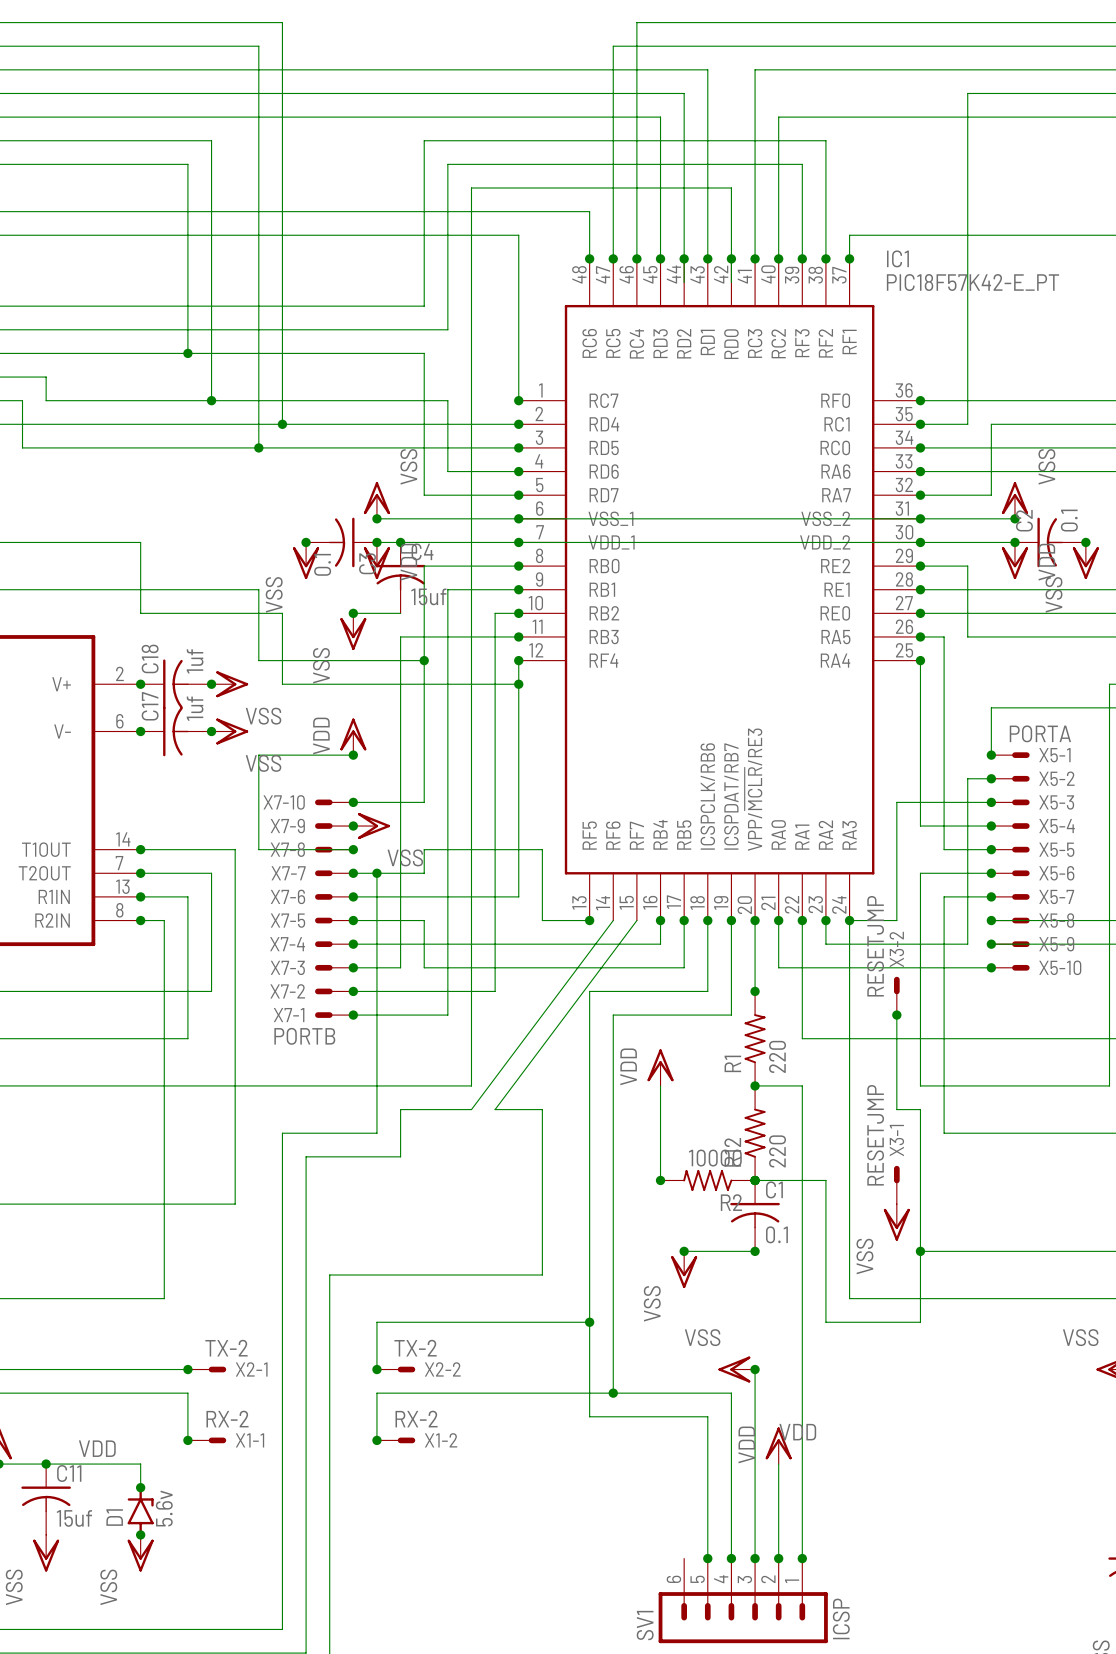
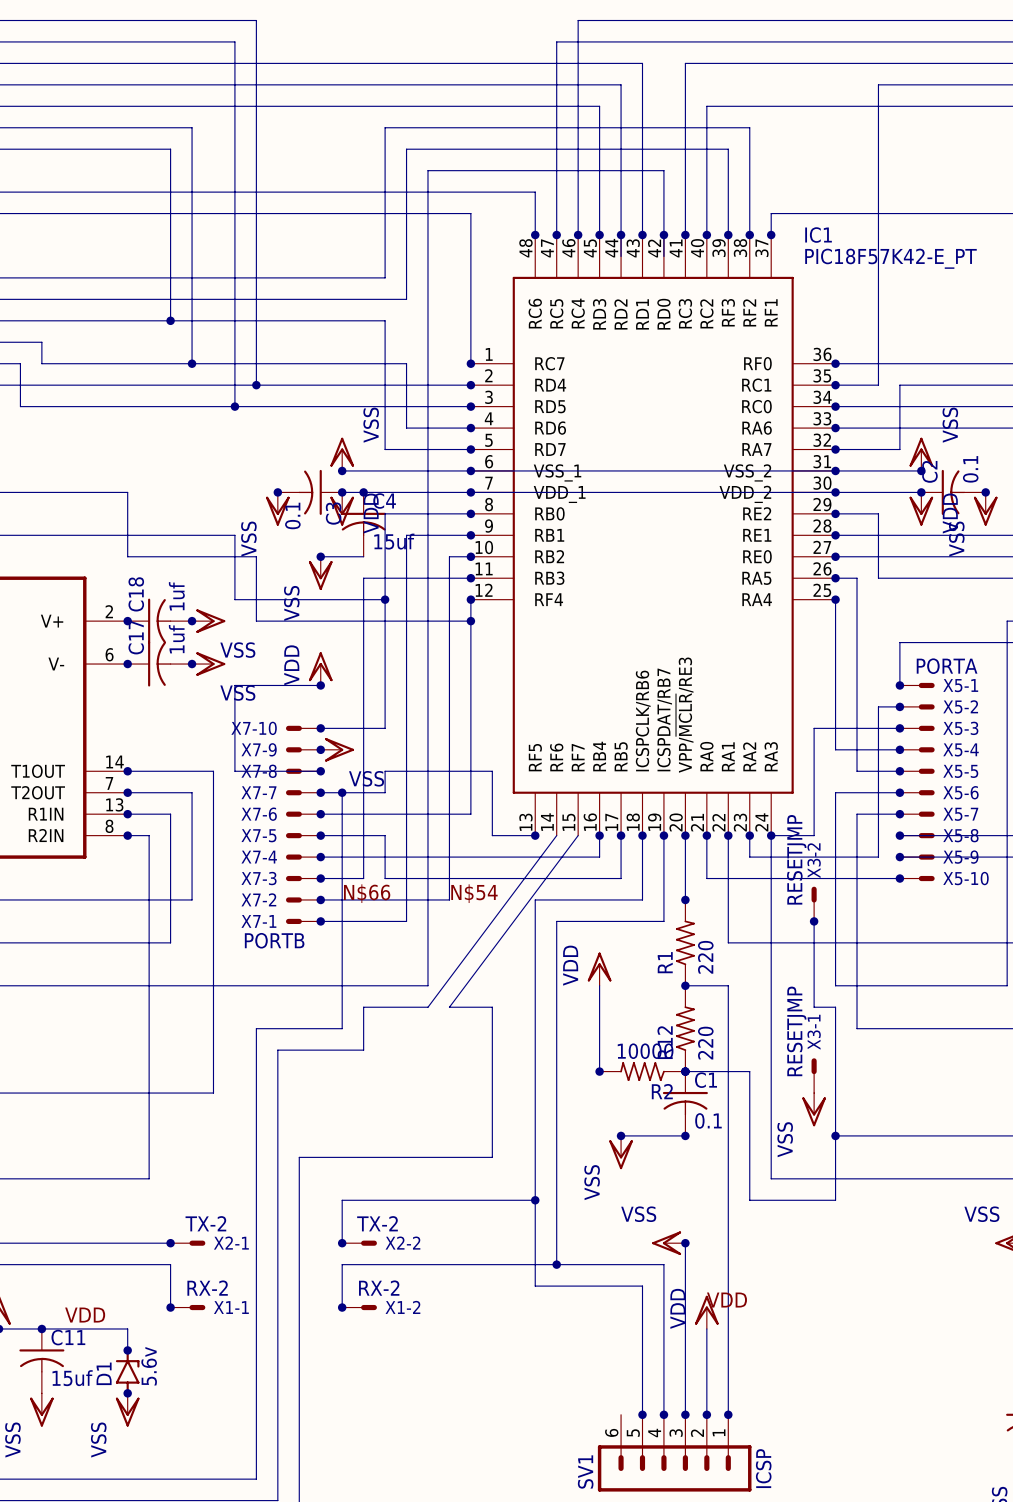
label: none -> N$66 (367, 893)
label: none -> N$54 (474, 893)

